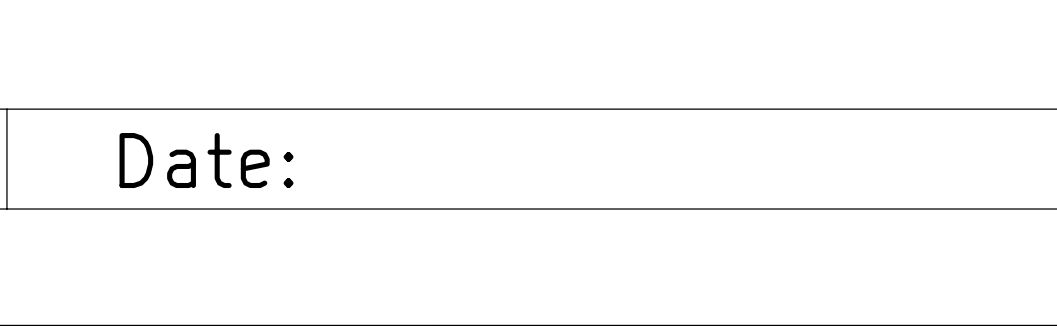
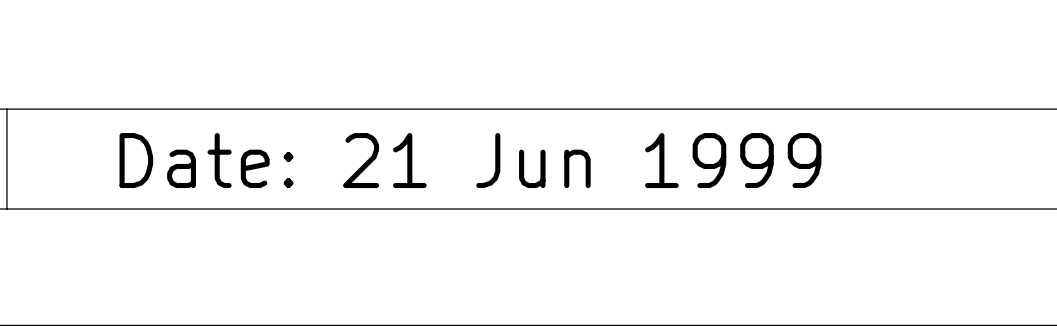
title block: Date: (206, 160) -> Date: 21 Jun 1999 (470, 160)

